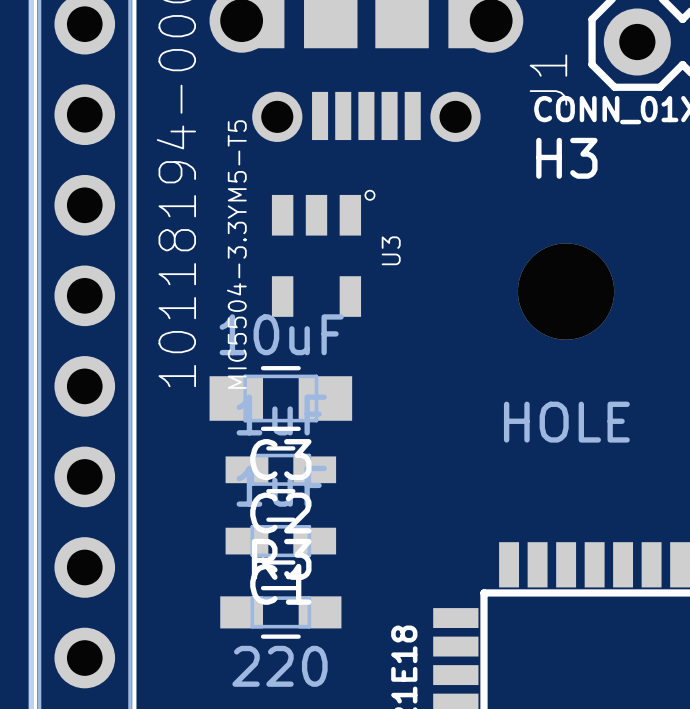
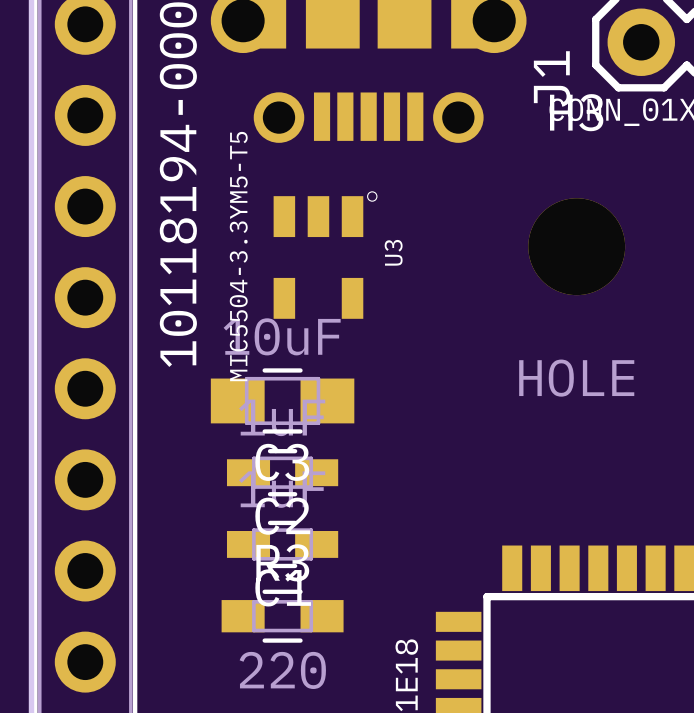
H3 position: (566, 291) -> (576, 246)

